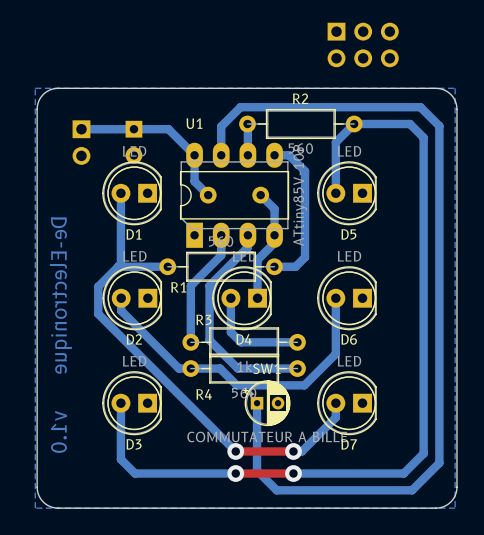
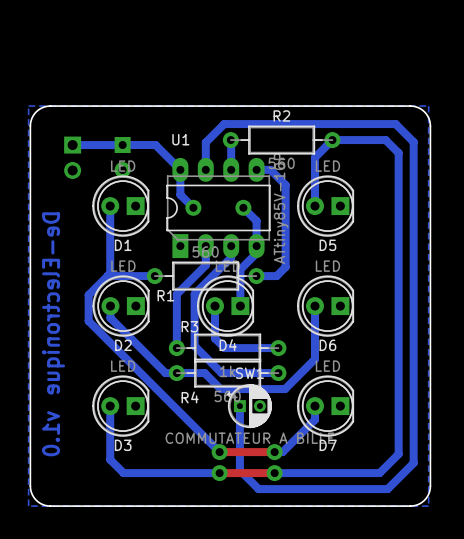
part: (363, 44) -> none

